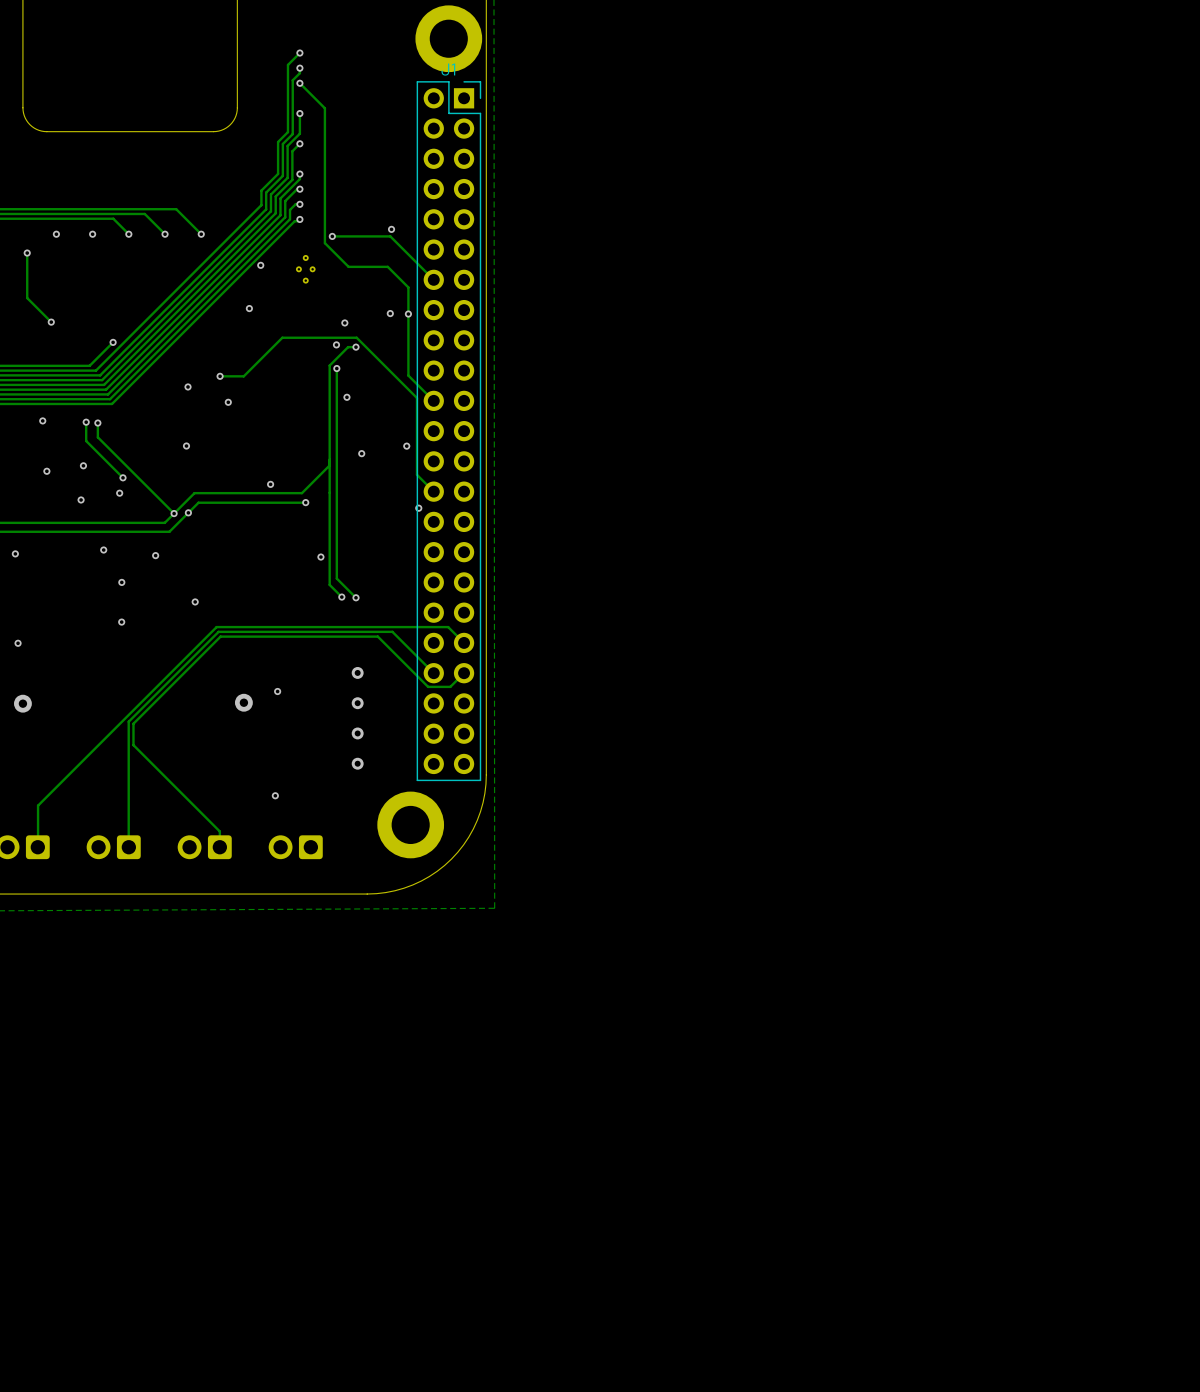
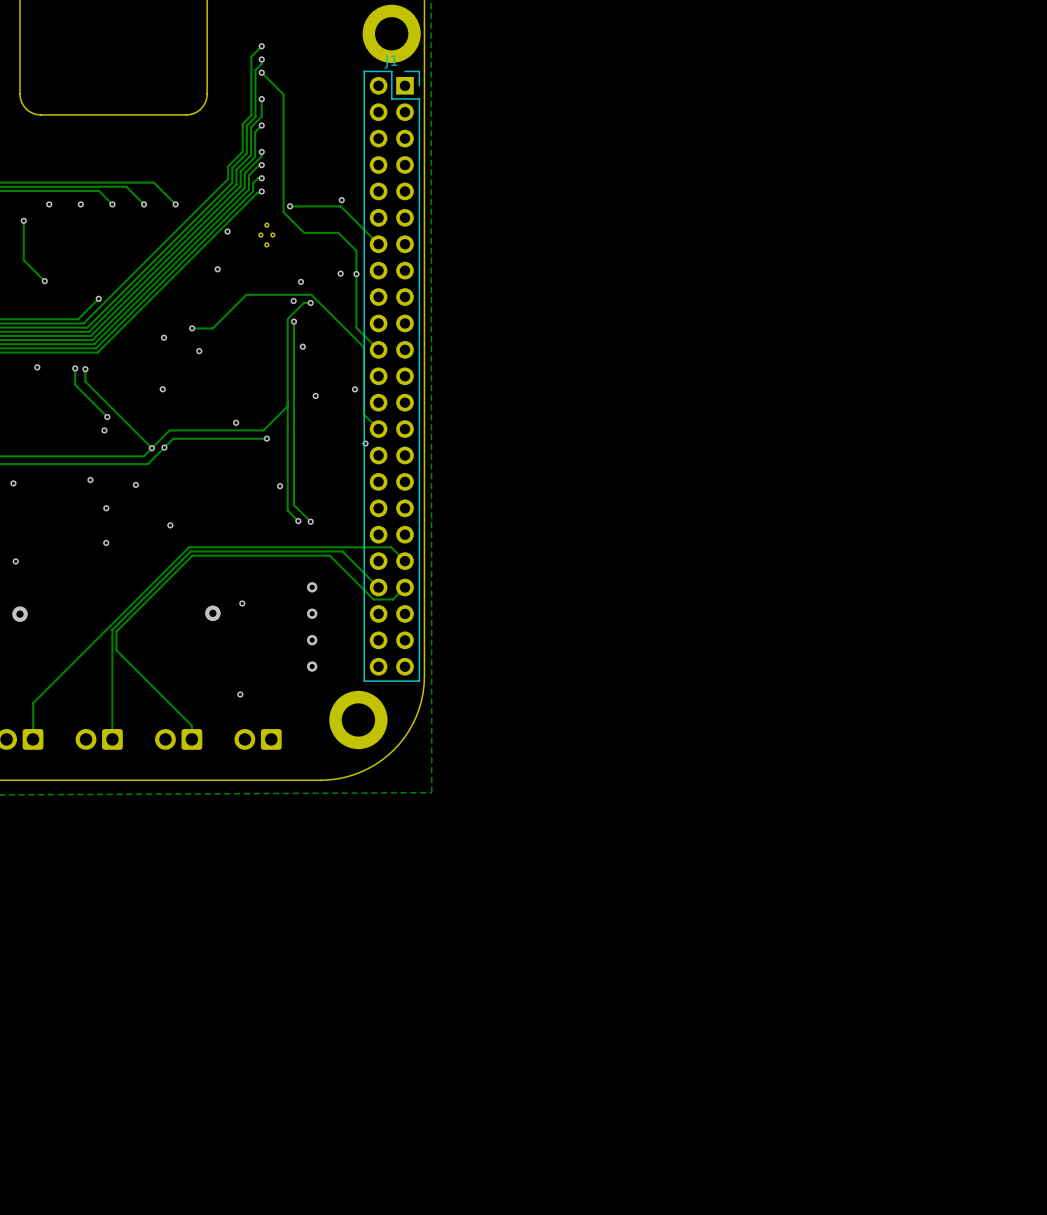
via: (83, 465) -> none
via: (46, 471) -> none
via: (81, 499) -> none

